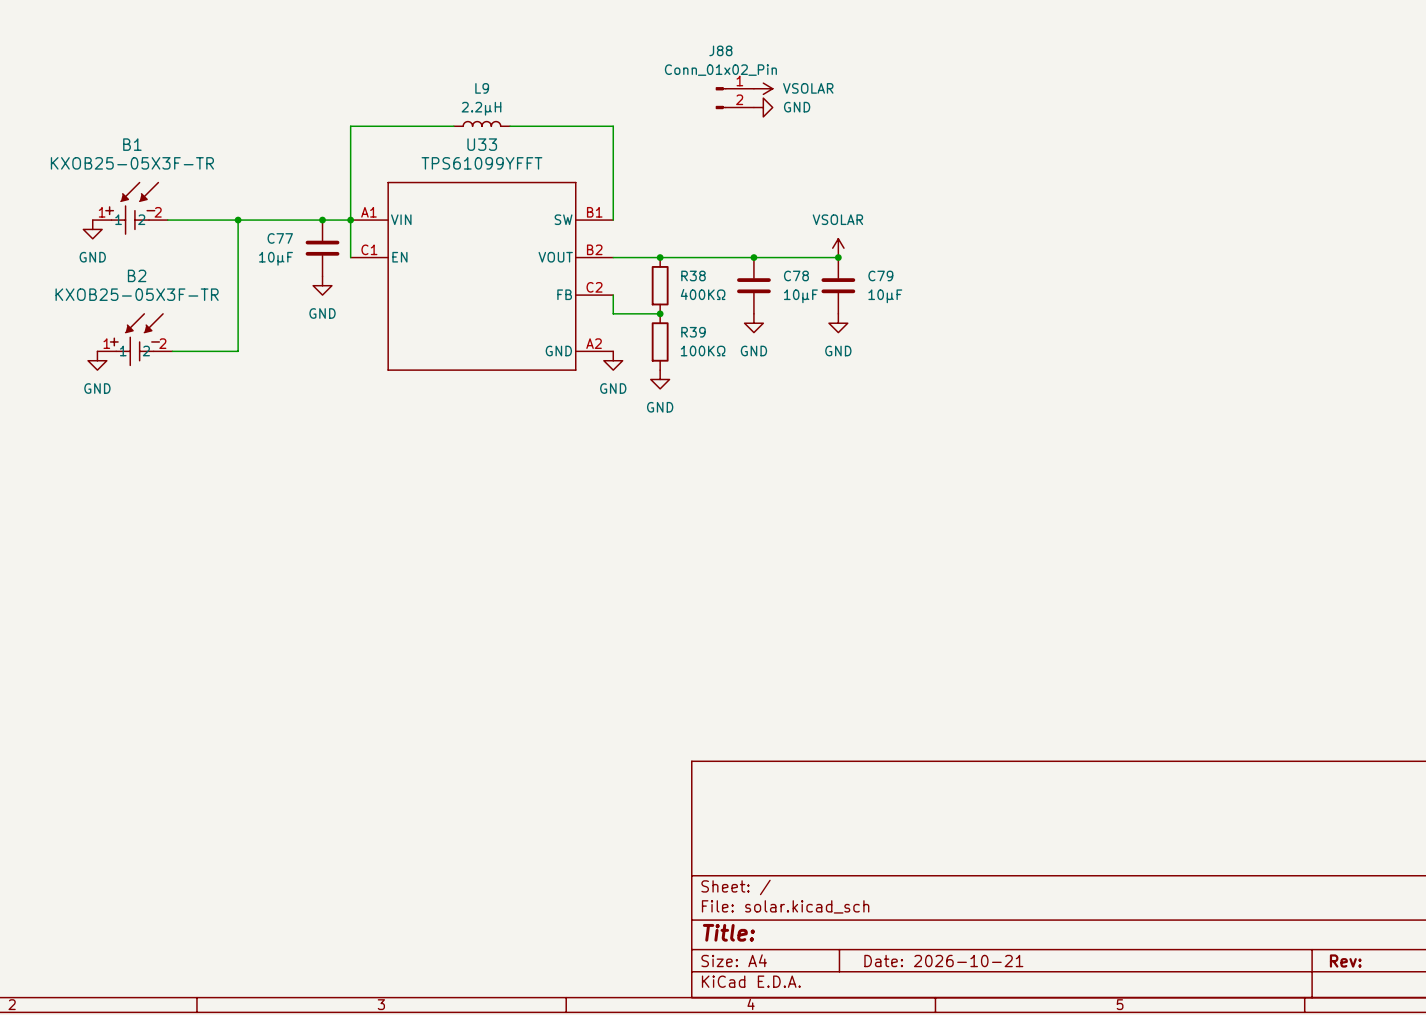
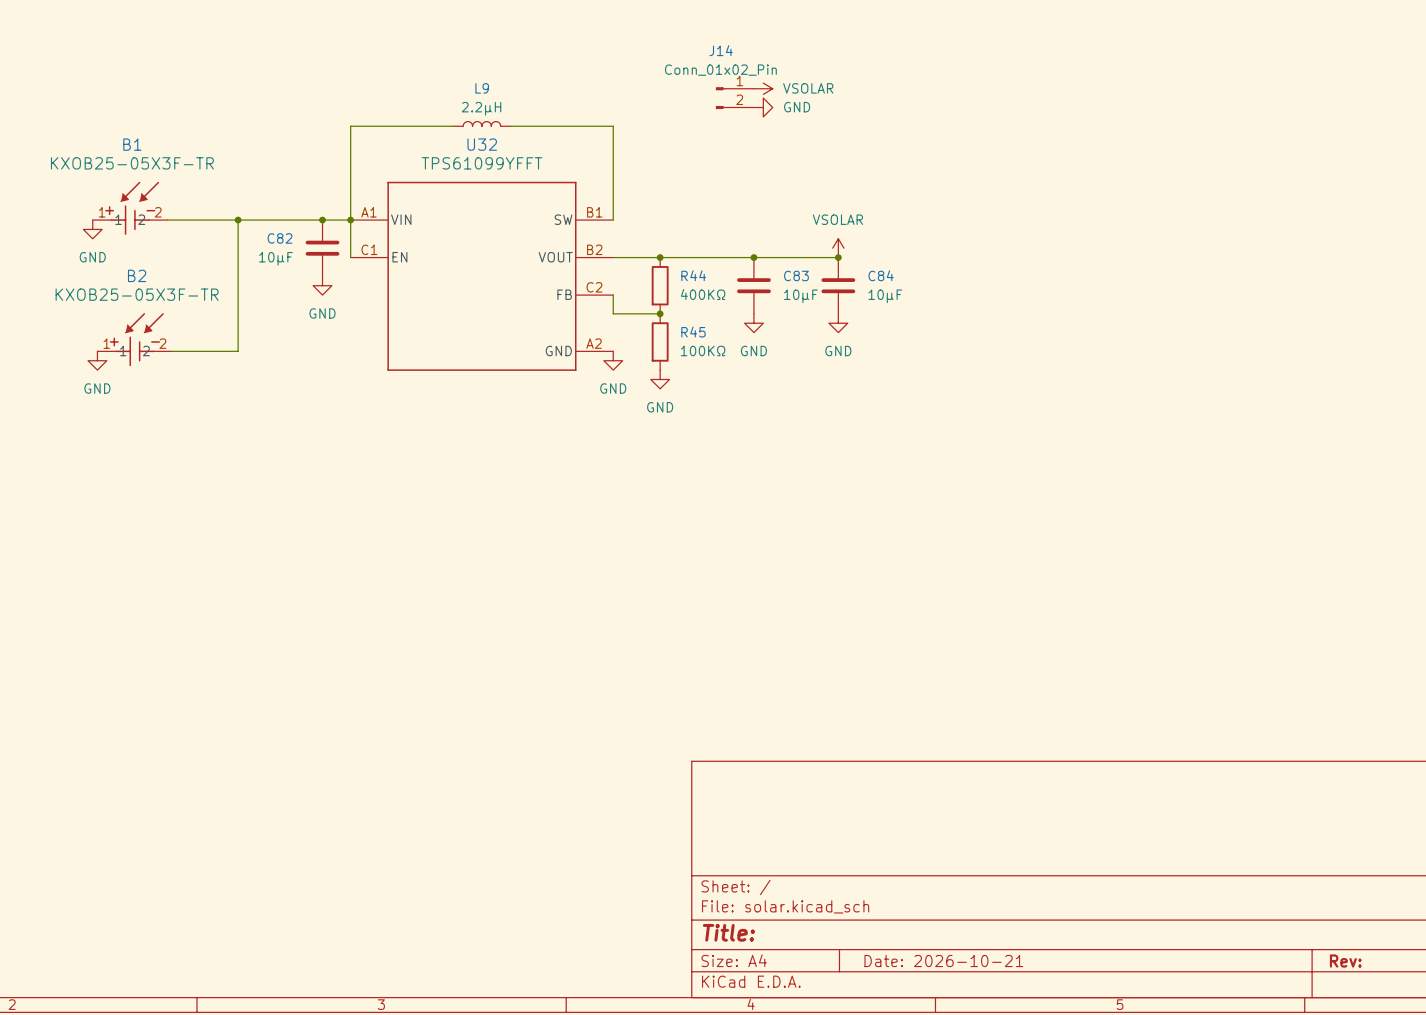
J88 name: J88 (720, 50) -> J14 (721, 50)
U33 name: U33 (482, 144) -> U32 (482, 144)
C77 name: C77 (280, 238) -> C82 (280, 238)
R38 name: R38 (693, 275) -> R44 (693, 275)
C78 name: C78 (796, 275) -> C83 (796, 275)
C79 name: C79 (880, 275) -> C84 (881, 275)
R39 name: R39 (693, 332) -> R45 (693, 332)

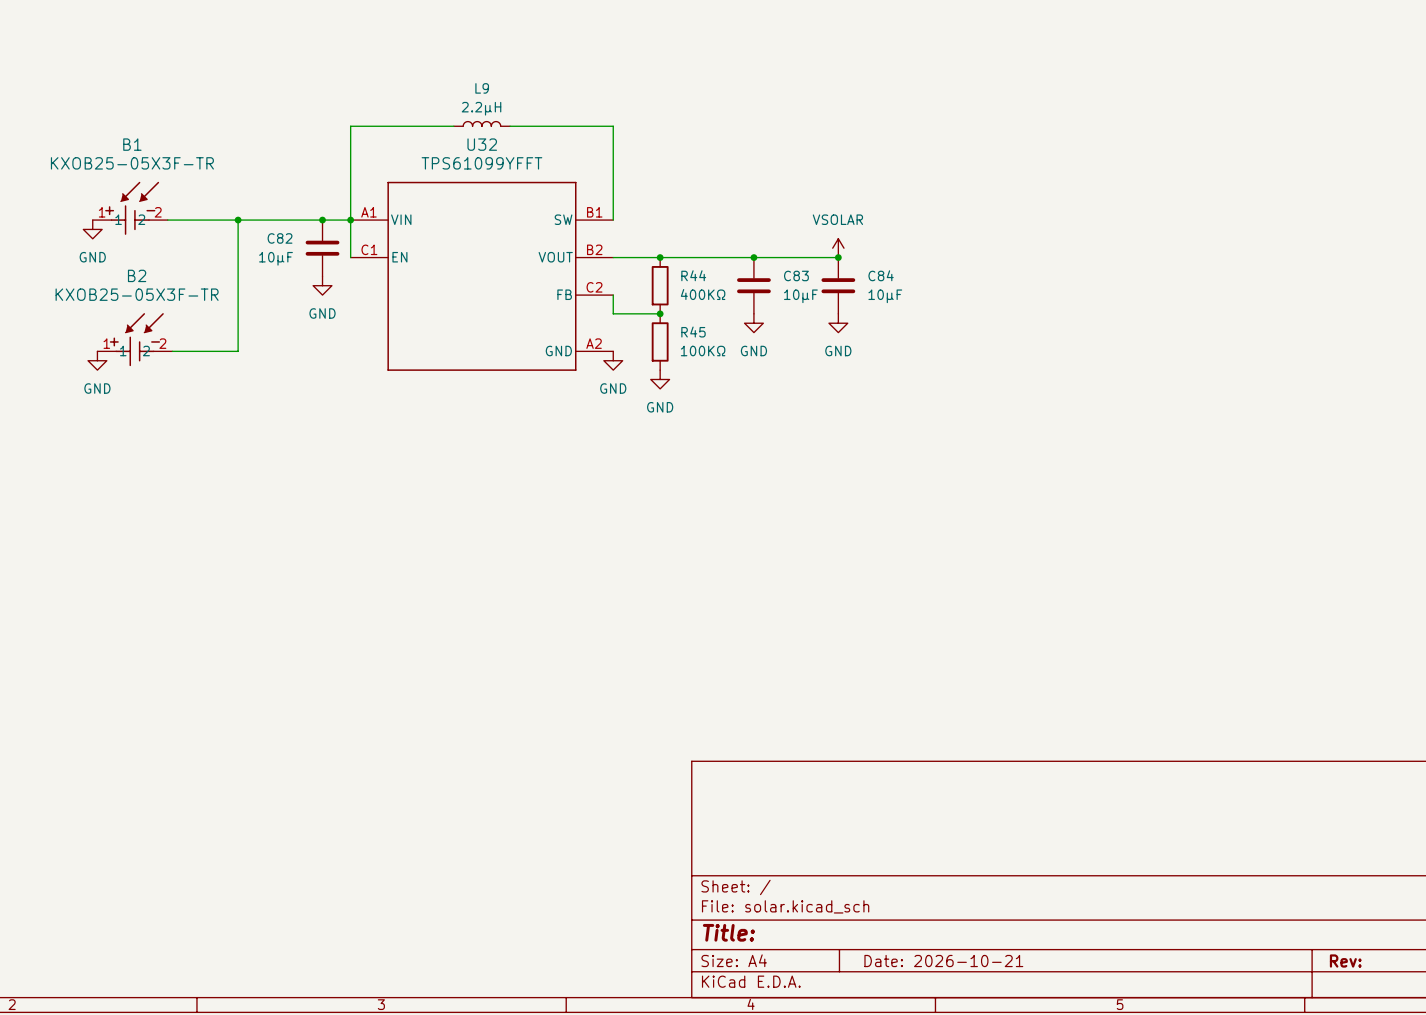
power symbol: VSOLAR (763, 88) -> none
J14: Conn_01x02_Pin (734, 98) -> none
power symbol: GND (763, 107) -> none

